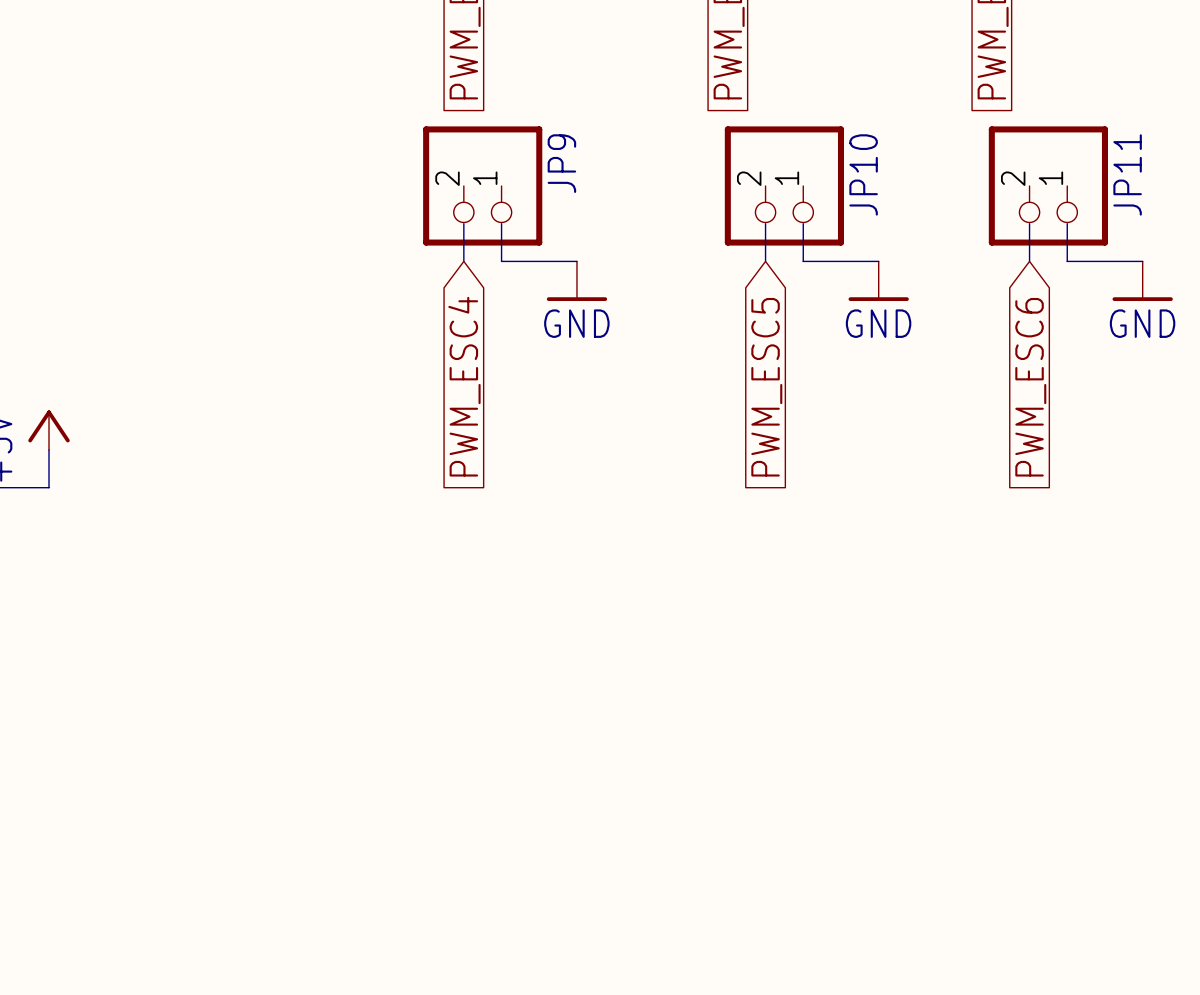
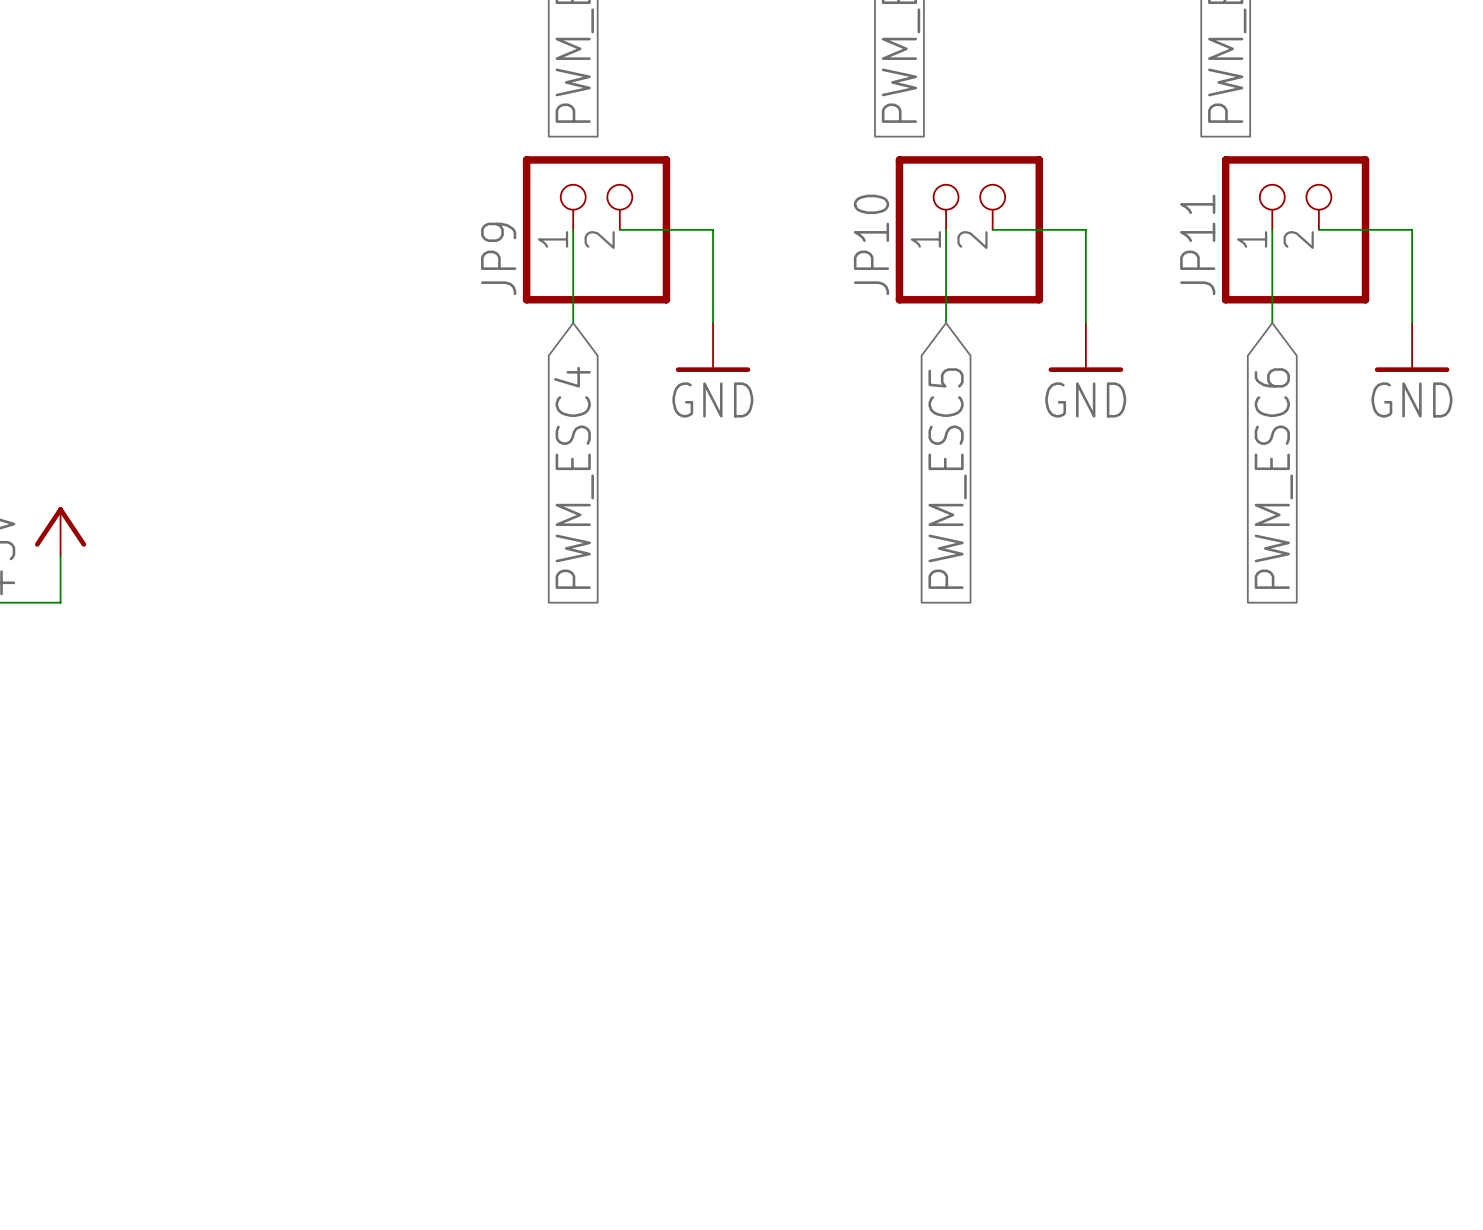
wire: none -> (573, 229) (573, 276)
JP9 rotation: 0° (482, 185) -> 180° (596, 229)
wire: none -> (946, 229) (946, 276)
JP10 rotation: 0° (784, 185) -> 180° (969, 229)
wire: none -> (1272, 229) (1272, 276)
JP11 rotation: 0° (1048, 185) -> 180° (1295, 229)
wire: (501, 223) (501, 261) (576, 261) -> (619, 229) (713, 229) (713, 323)
wire: (803, 223) (803, 261) (878, 261) -> (992, 229) (1085, 229) (1085, 323)
wire: (1067, 223) (1067, 261) (1142, 261) -> (1318, 229) (1412, 229) (1412, 323)

